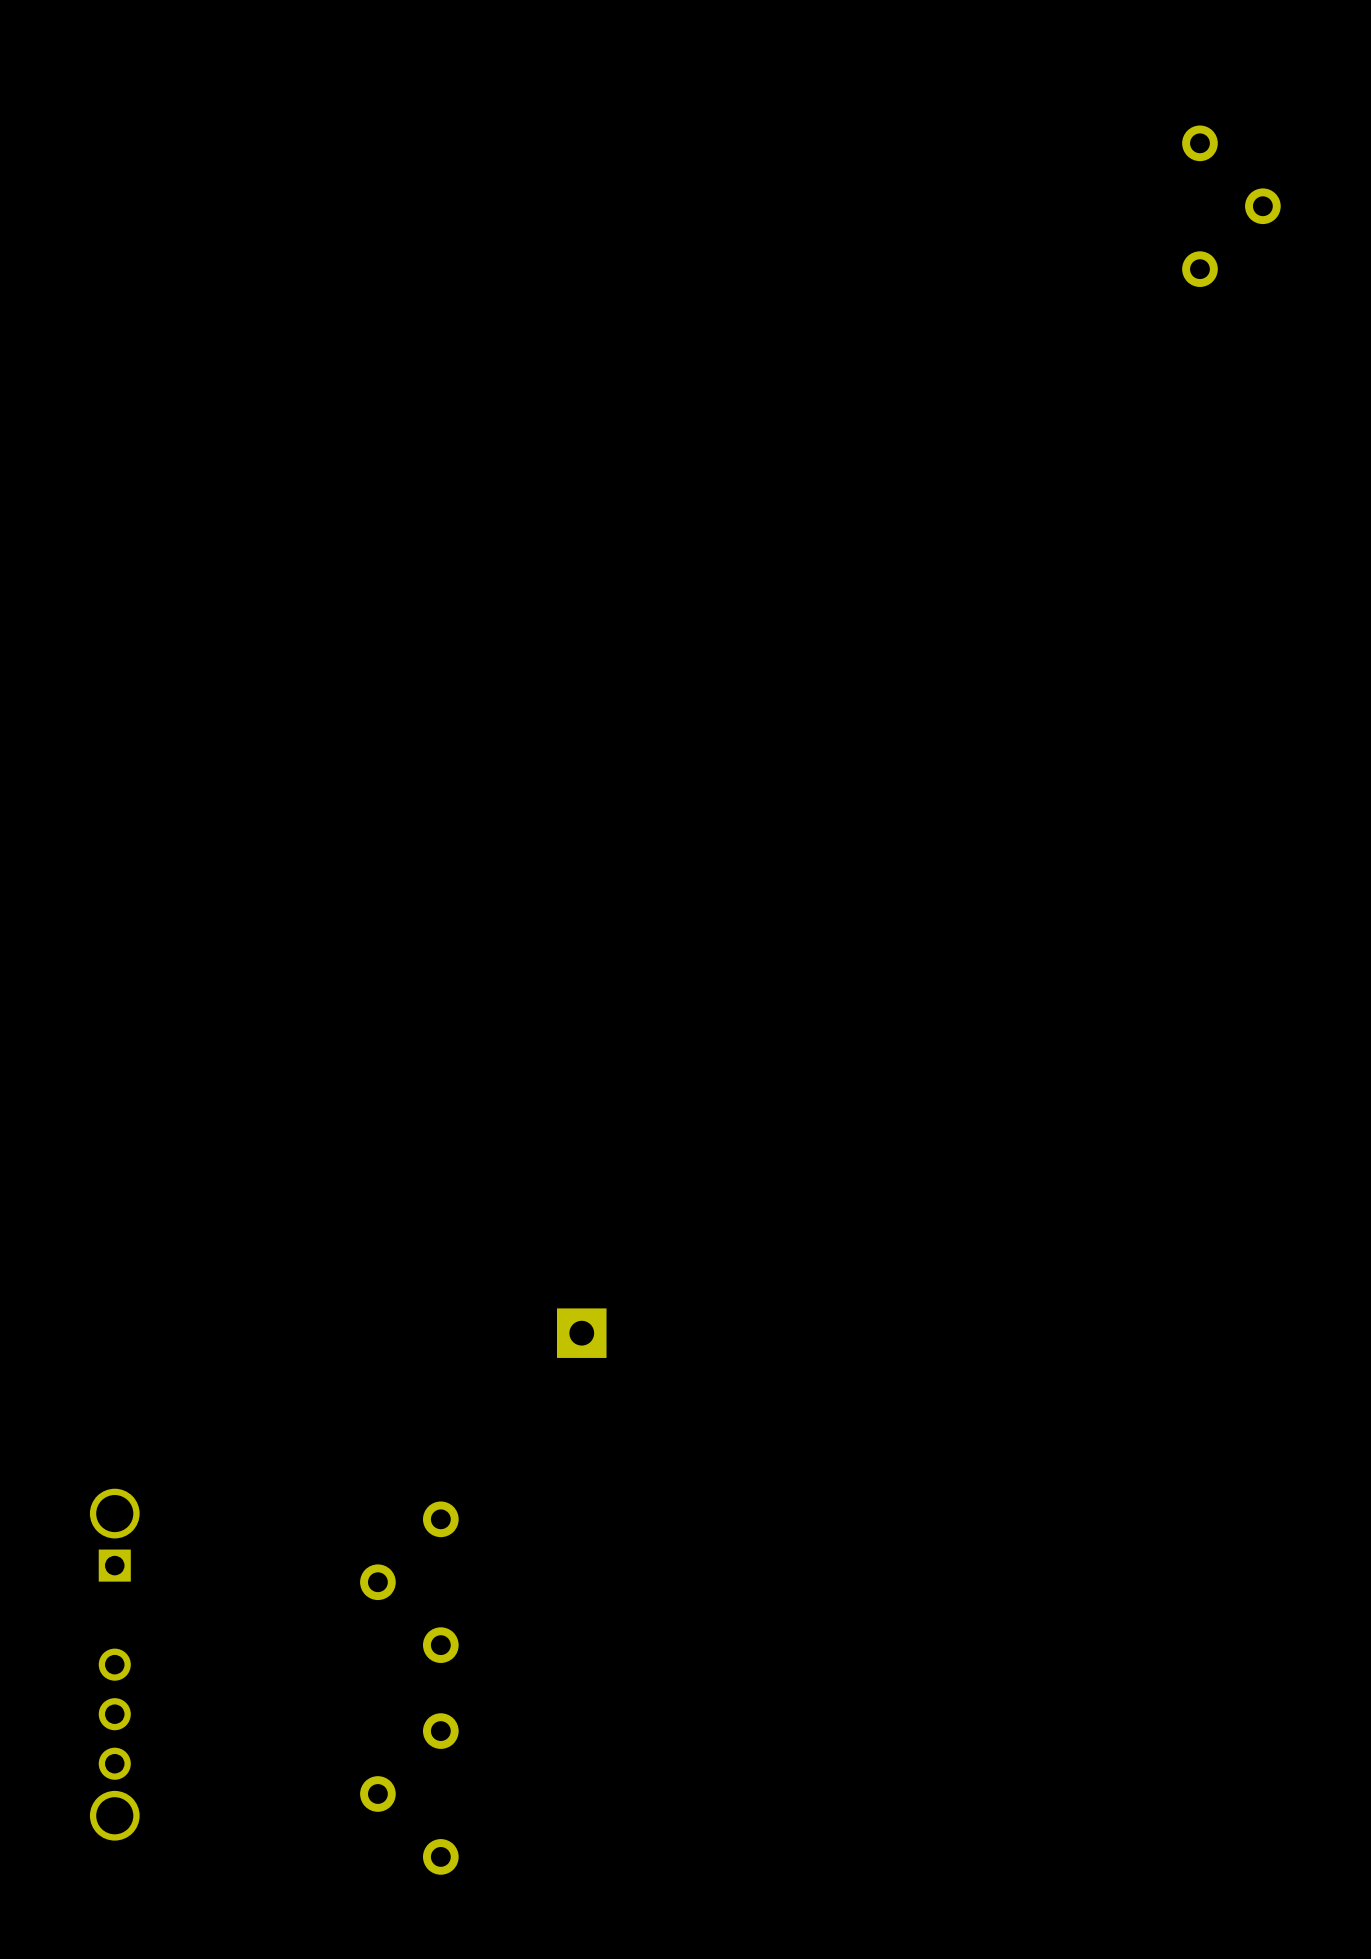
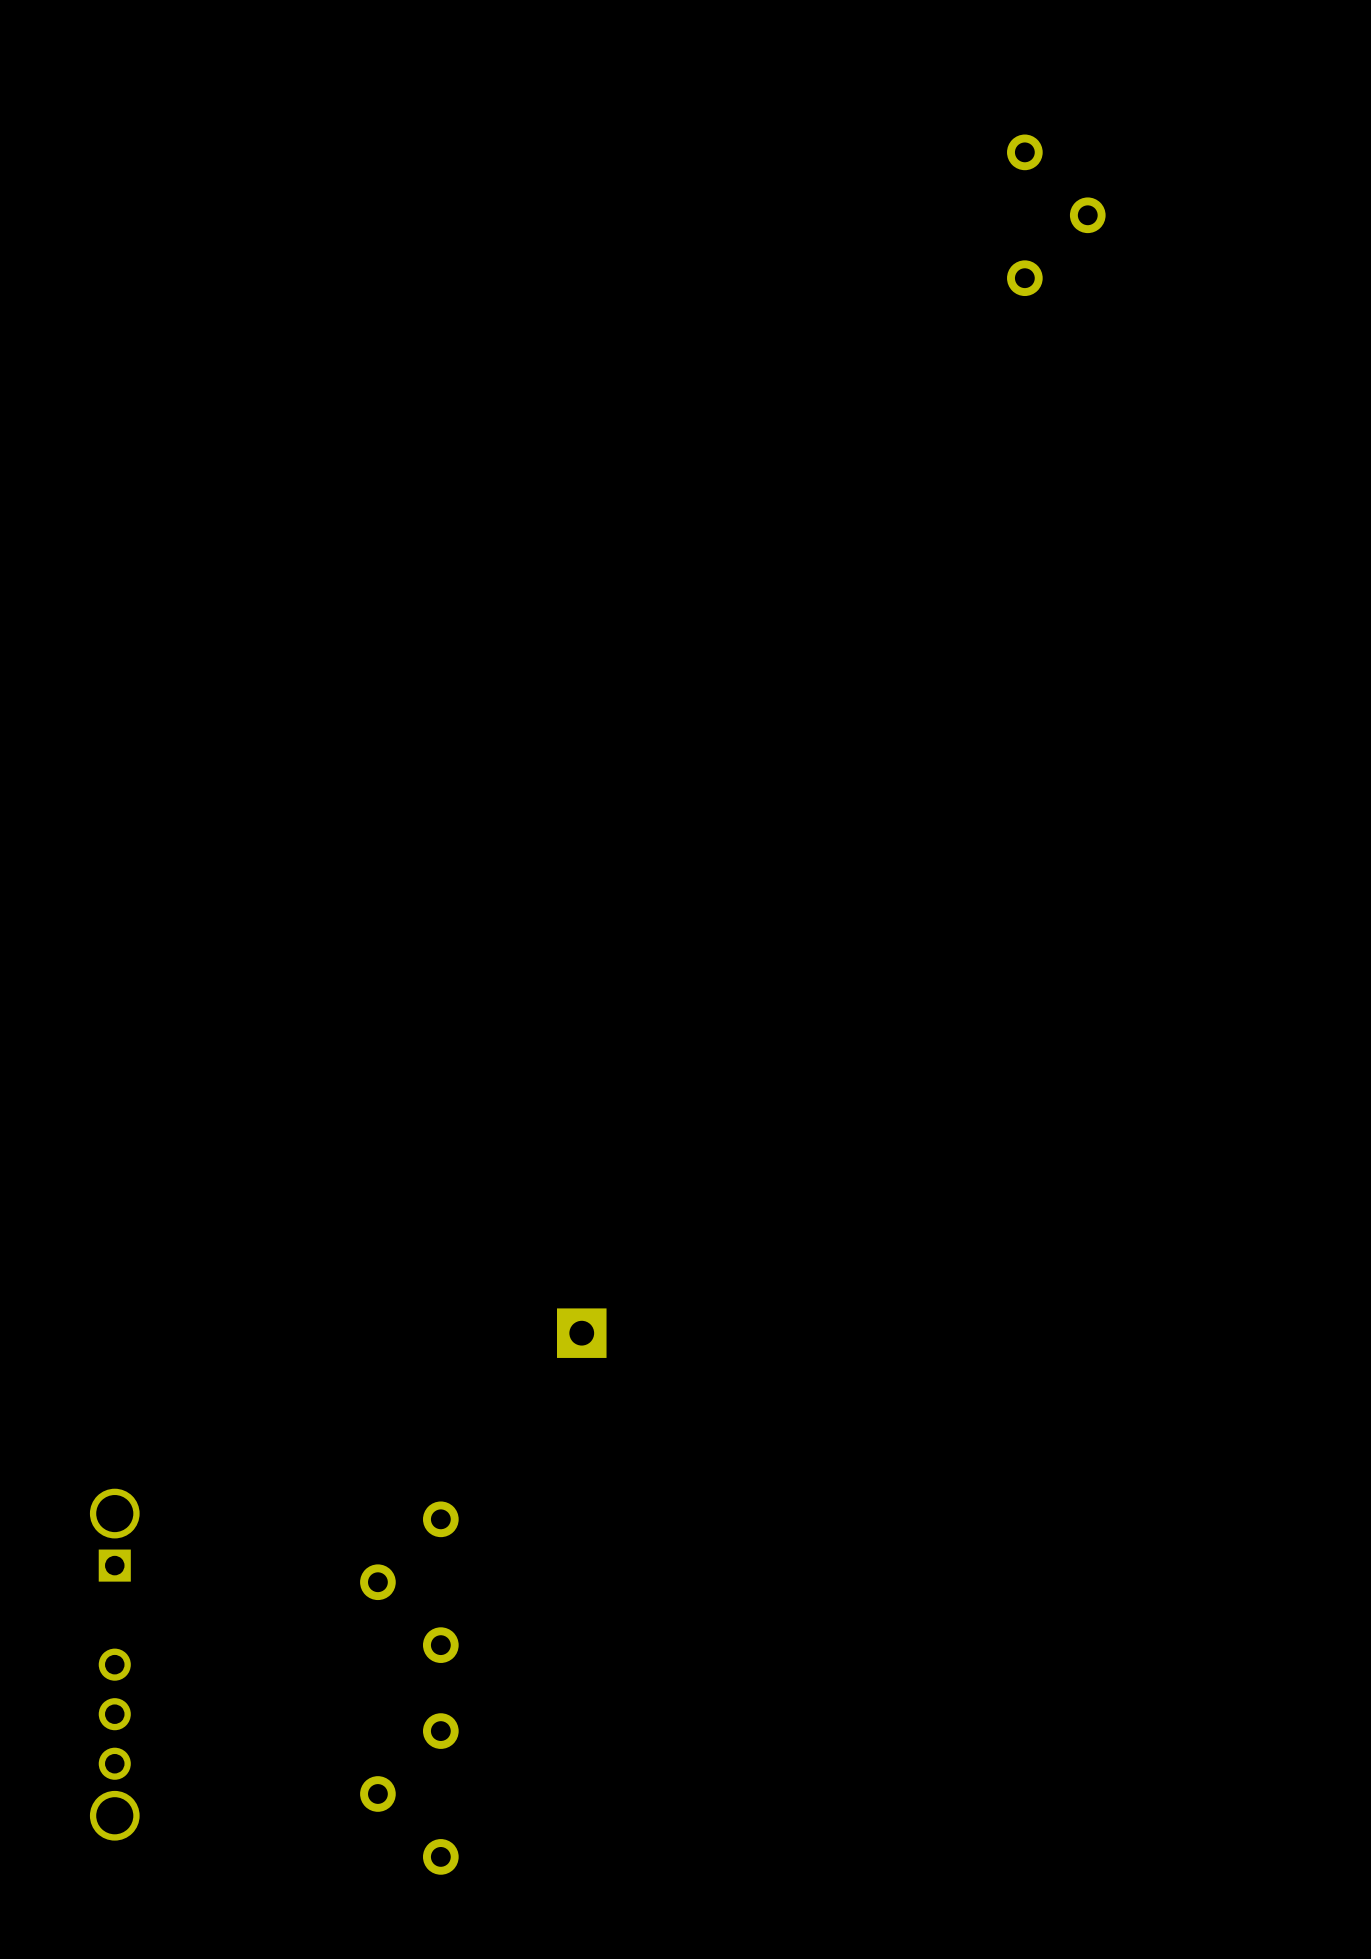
part position: (1231, 206) -> (1056, 215)

